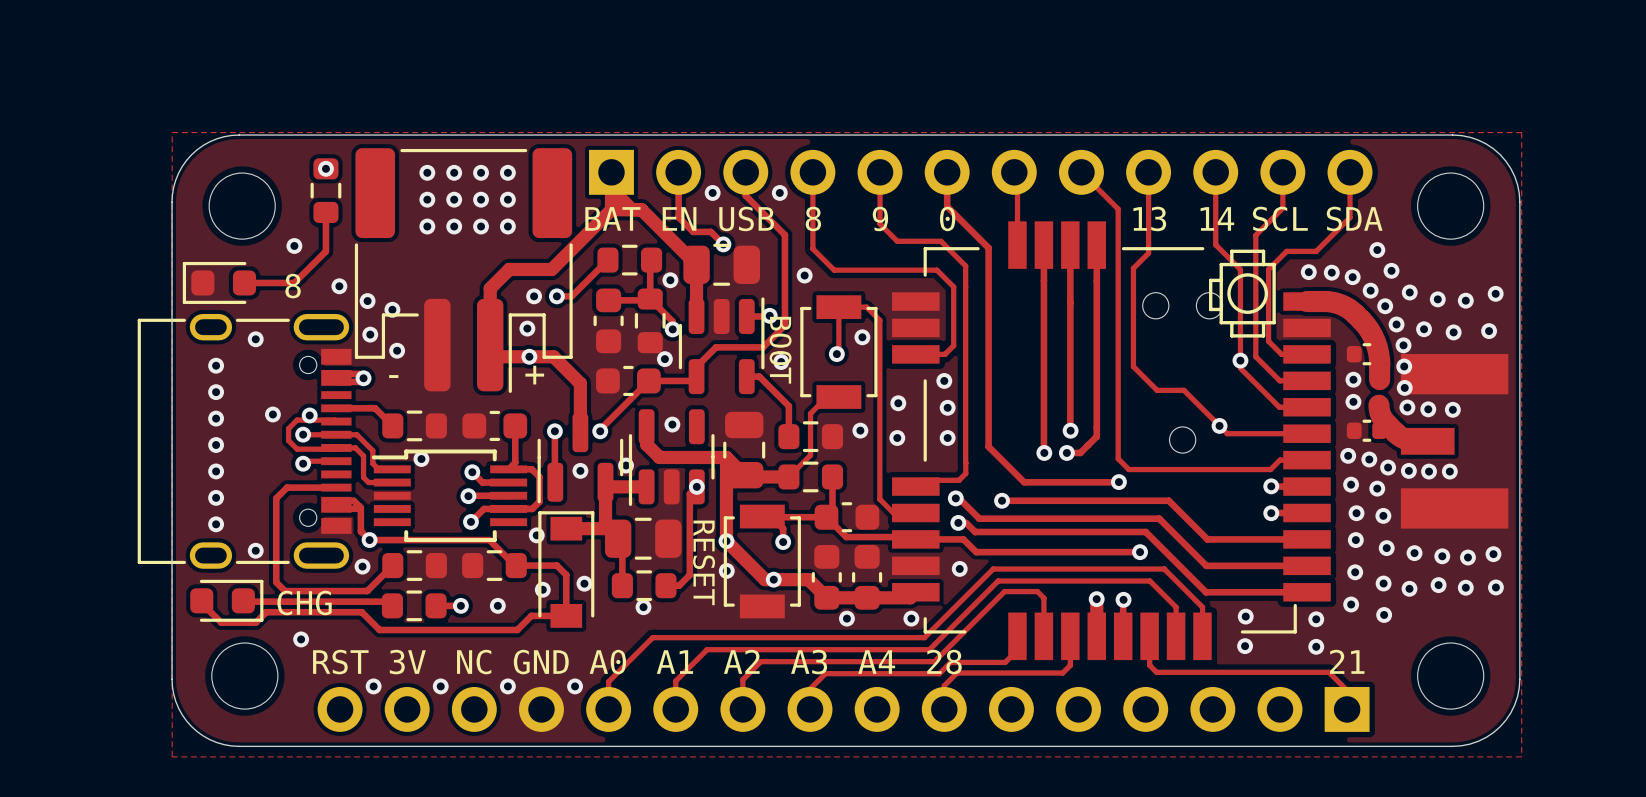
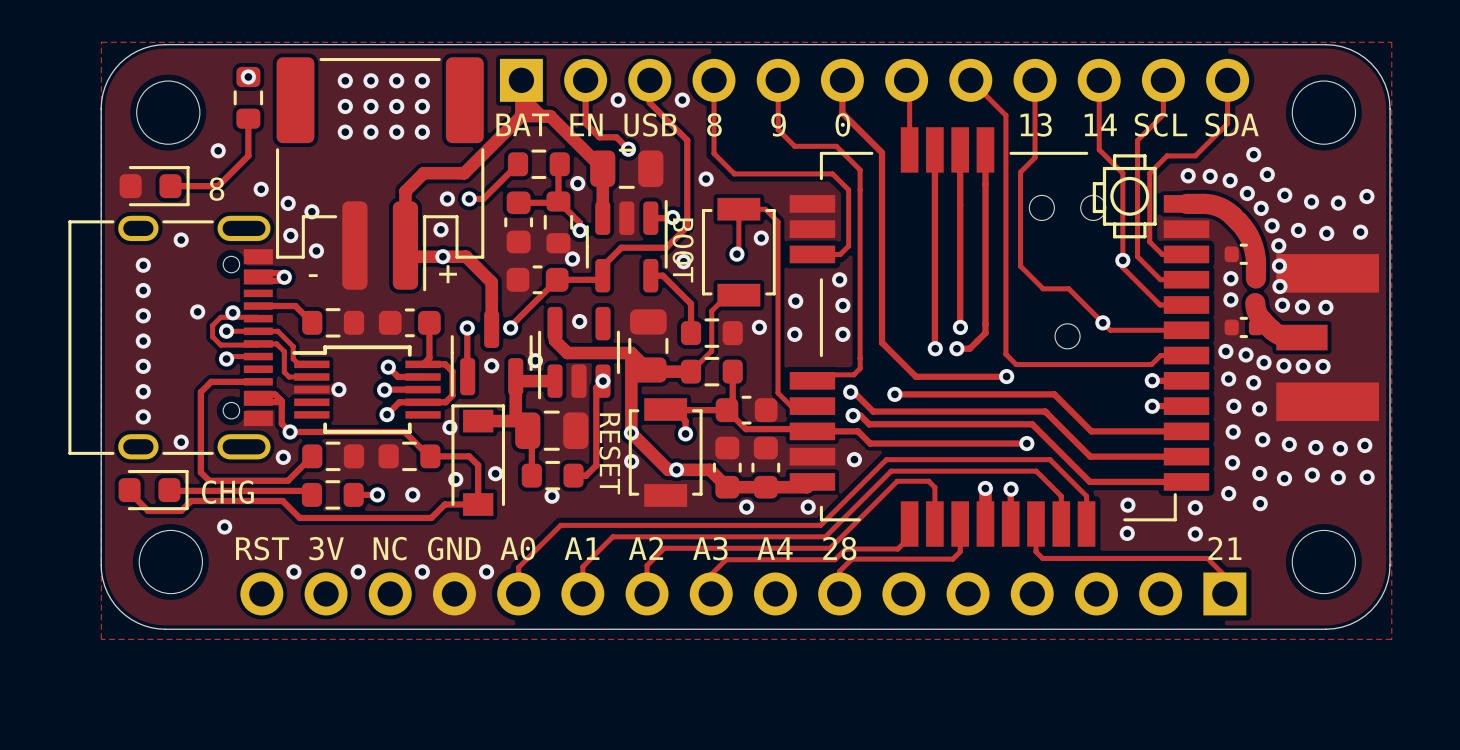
part rotation: 0° (219, 282) -> 180° (154, 186)
via position: (421, 459) -> (338, 389)

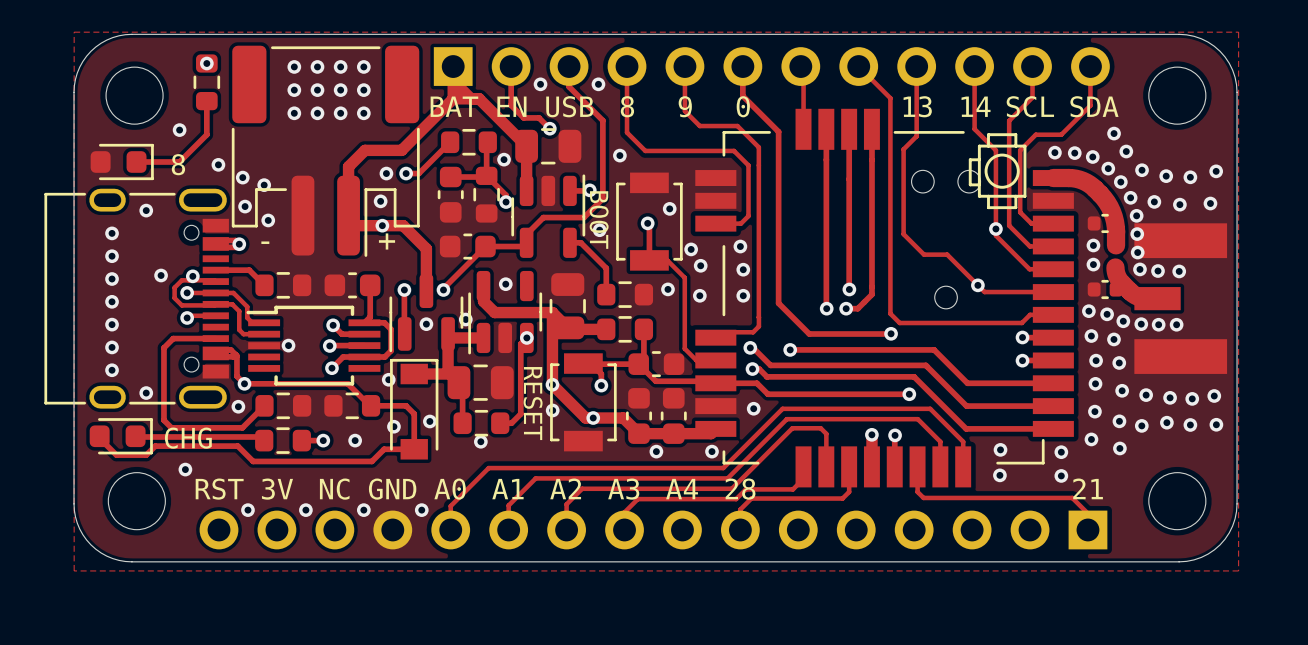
track: (736, 254) (738, 252) (738, 209) (765, 209) (778, 221) (778, 314) -> (647, 223) (649, 225) (649, 260) (667, 260) (684, 277)
via: (572, 258) -> none
via: none -> (691, 249)
track: (738, 295) (727, 295) (711, 311) (711, 350) (691, 371) -> none

